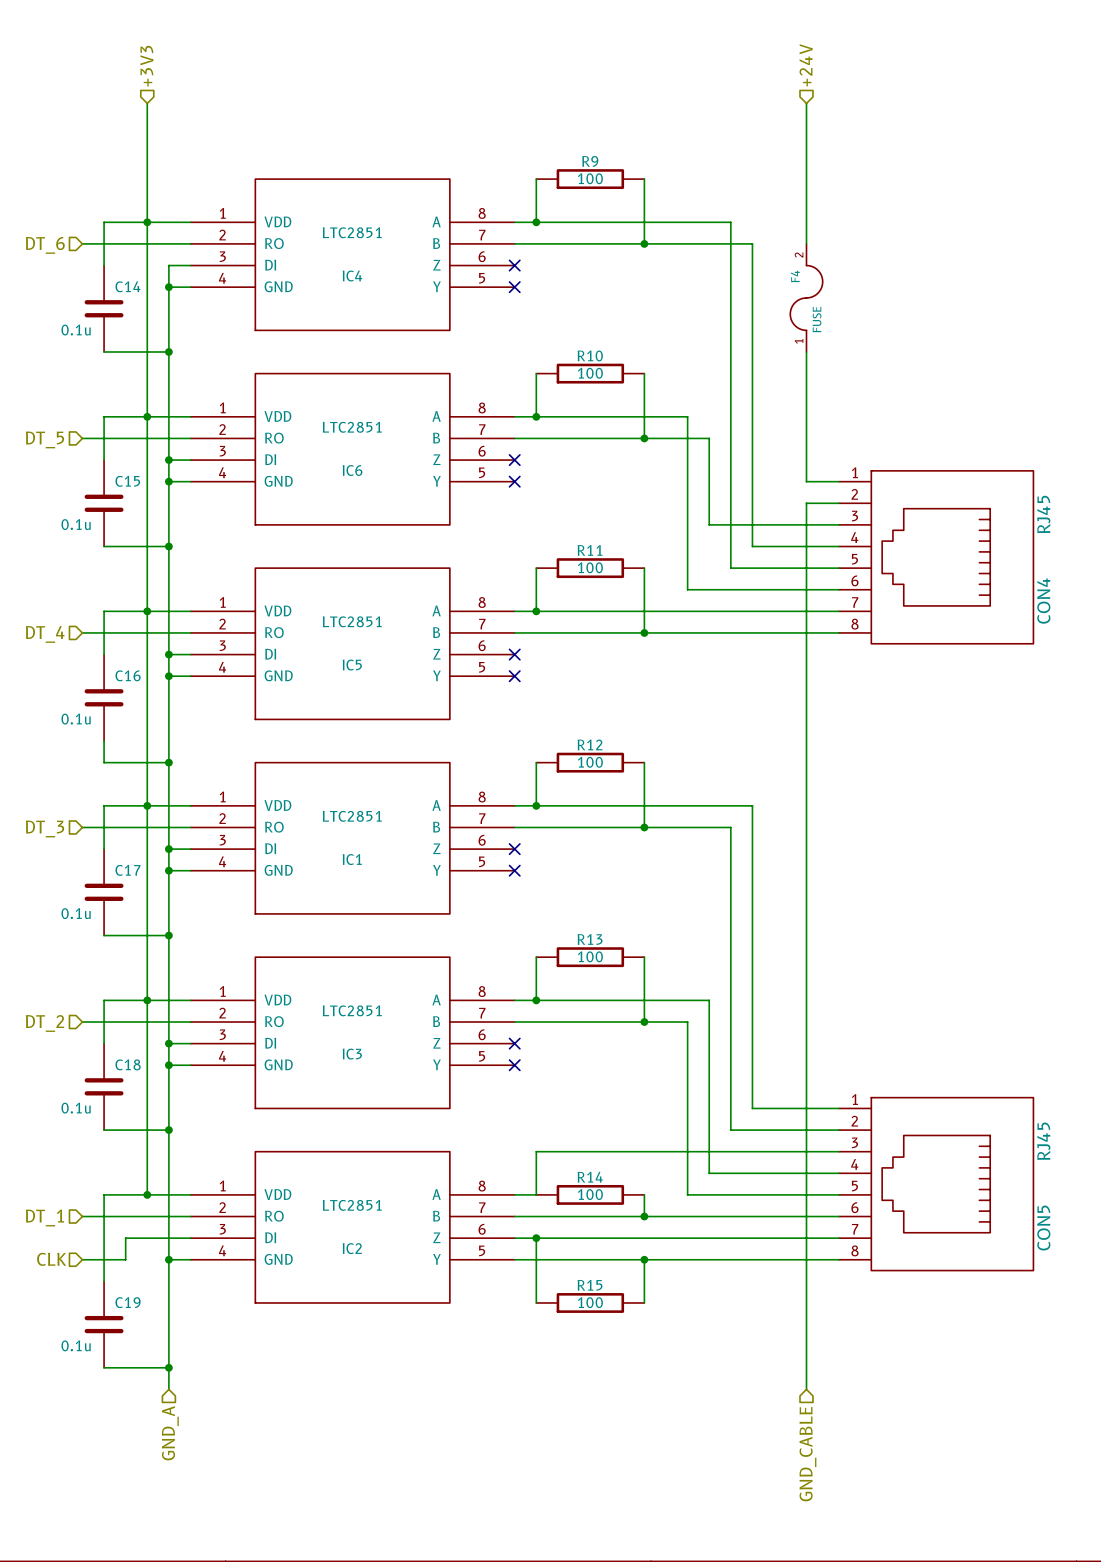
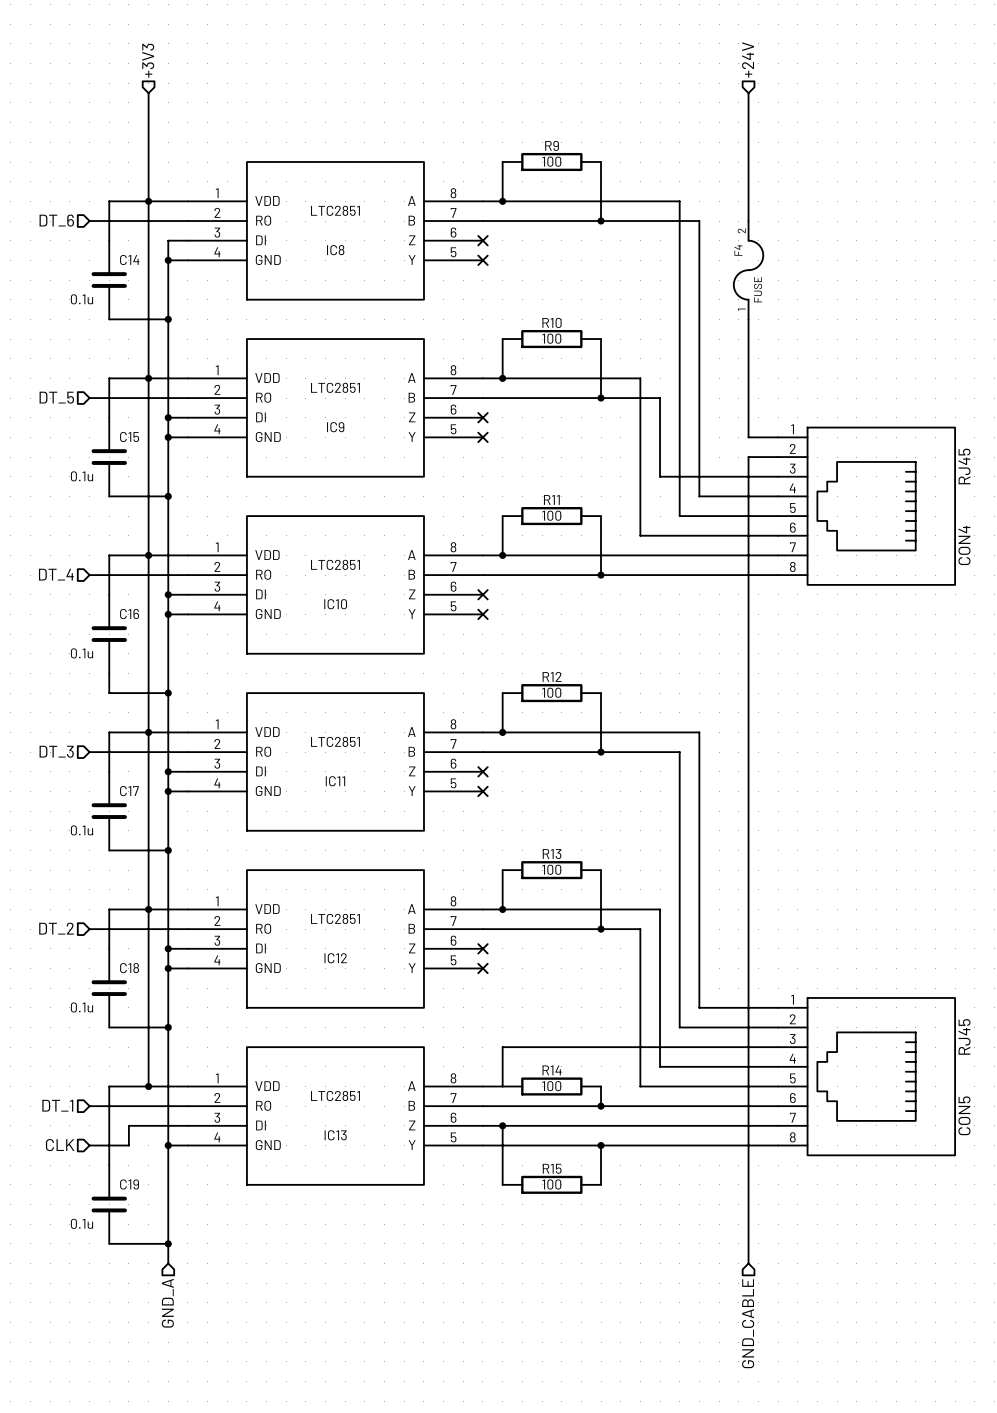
IC4 name: IC4 (352, 276) -> IC8 (335, 250)
IC6 name: IC6 (352, 470) -> IC9 (335, 427)
IC5 name: IC5 (352, 665) -> IC10 (335, 604)
IC1 name: IC1 (352, 859) -> IC11 (335, 781)
IC3 name: IC3 (352, 1054) -> IC12 (335, 958)
IC2 name: IC2 (352, 1248) -> IC13 (335, 1135)

